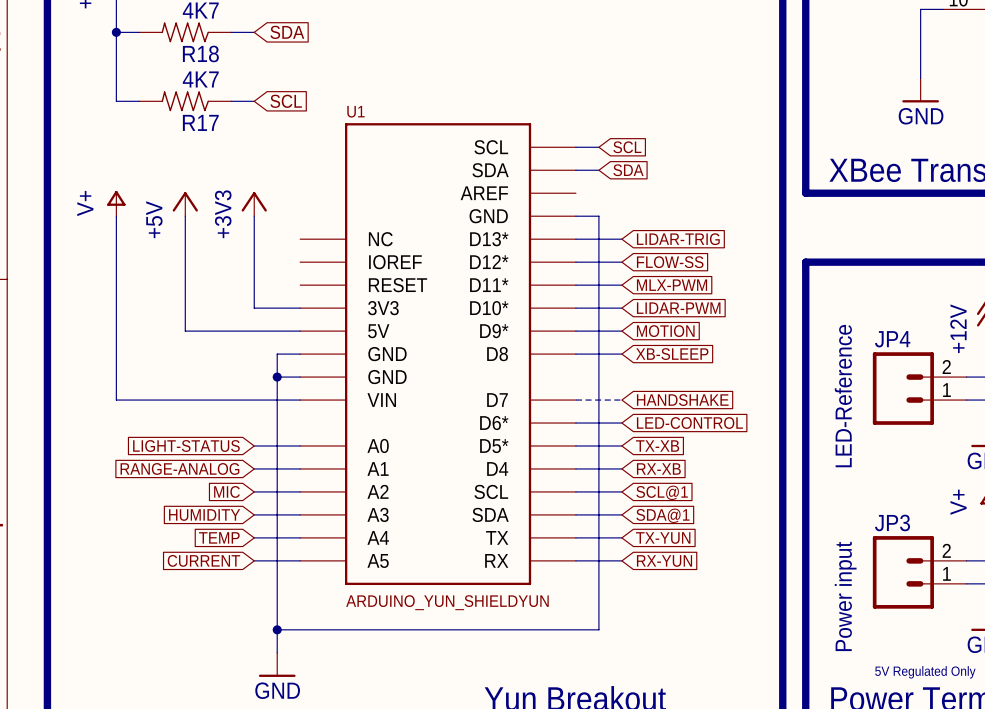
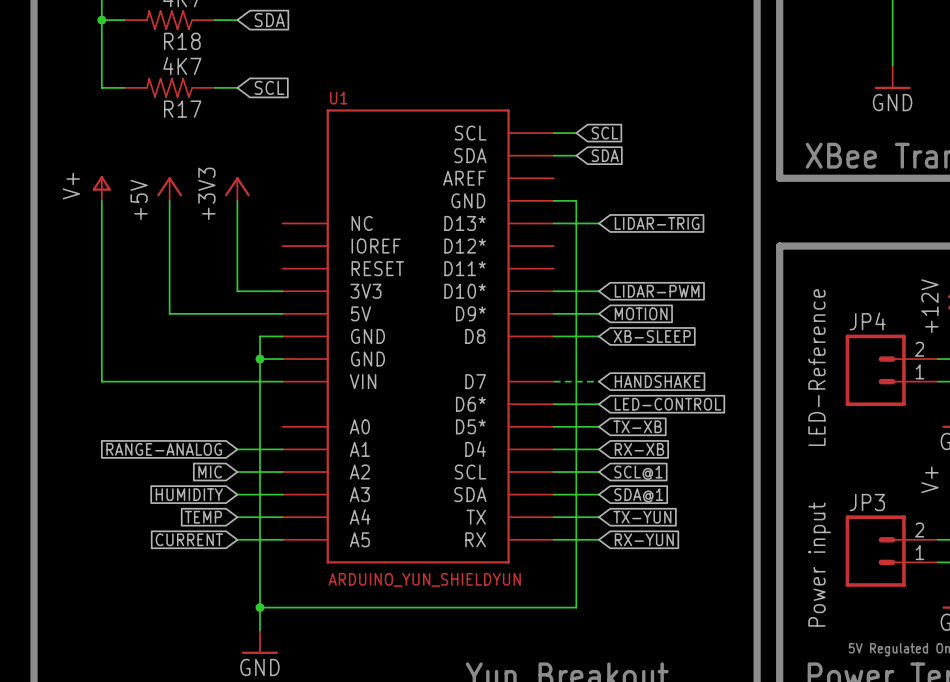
wire: (575, 262) (621, 262) -> none
global label: FLOW-SS (670, 262) -> none
wire: (575, 285) (621, 285) -> none
global label: MLX-PWM (672, 285) -> none
global label: LIGHT-STATUS (186, 445) -> none
wire: (254, 446) (300, 446) -> none

